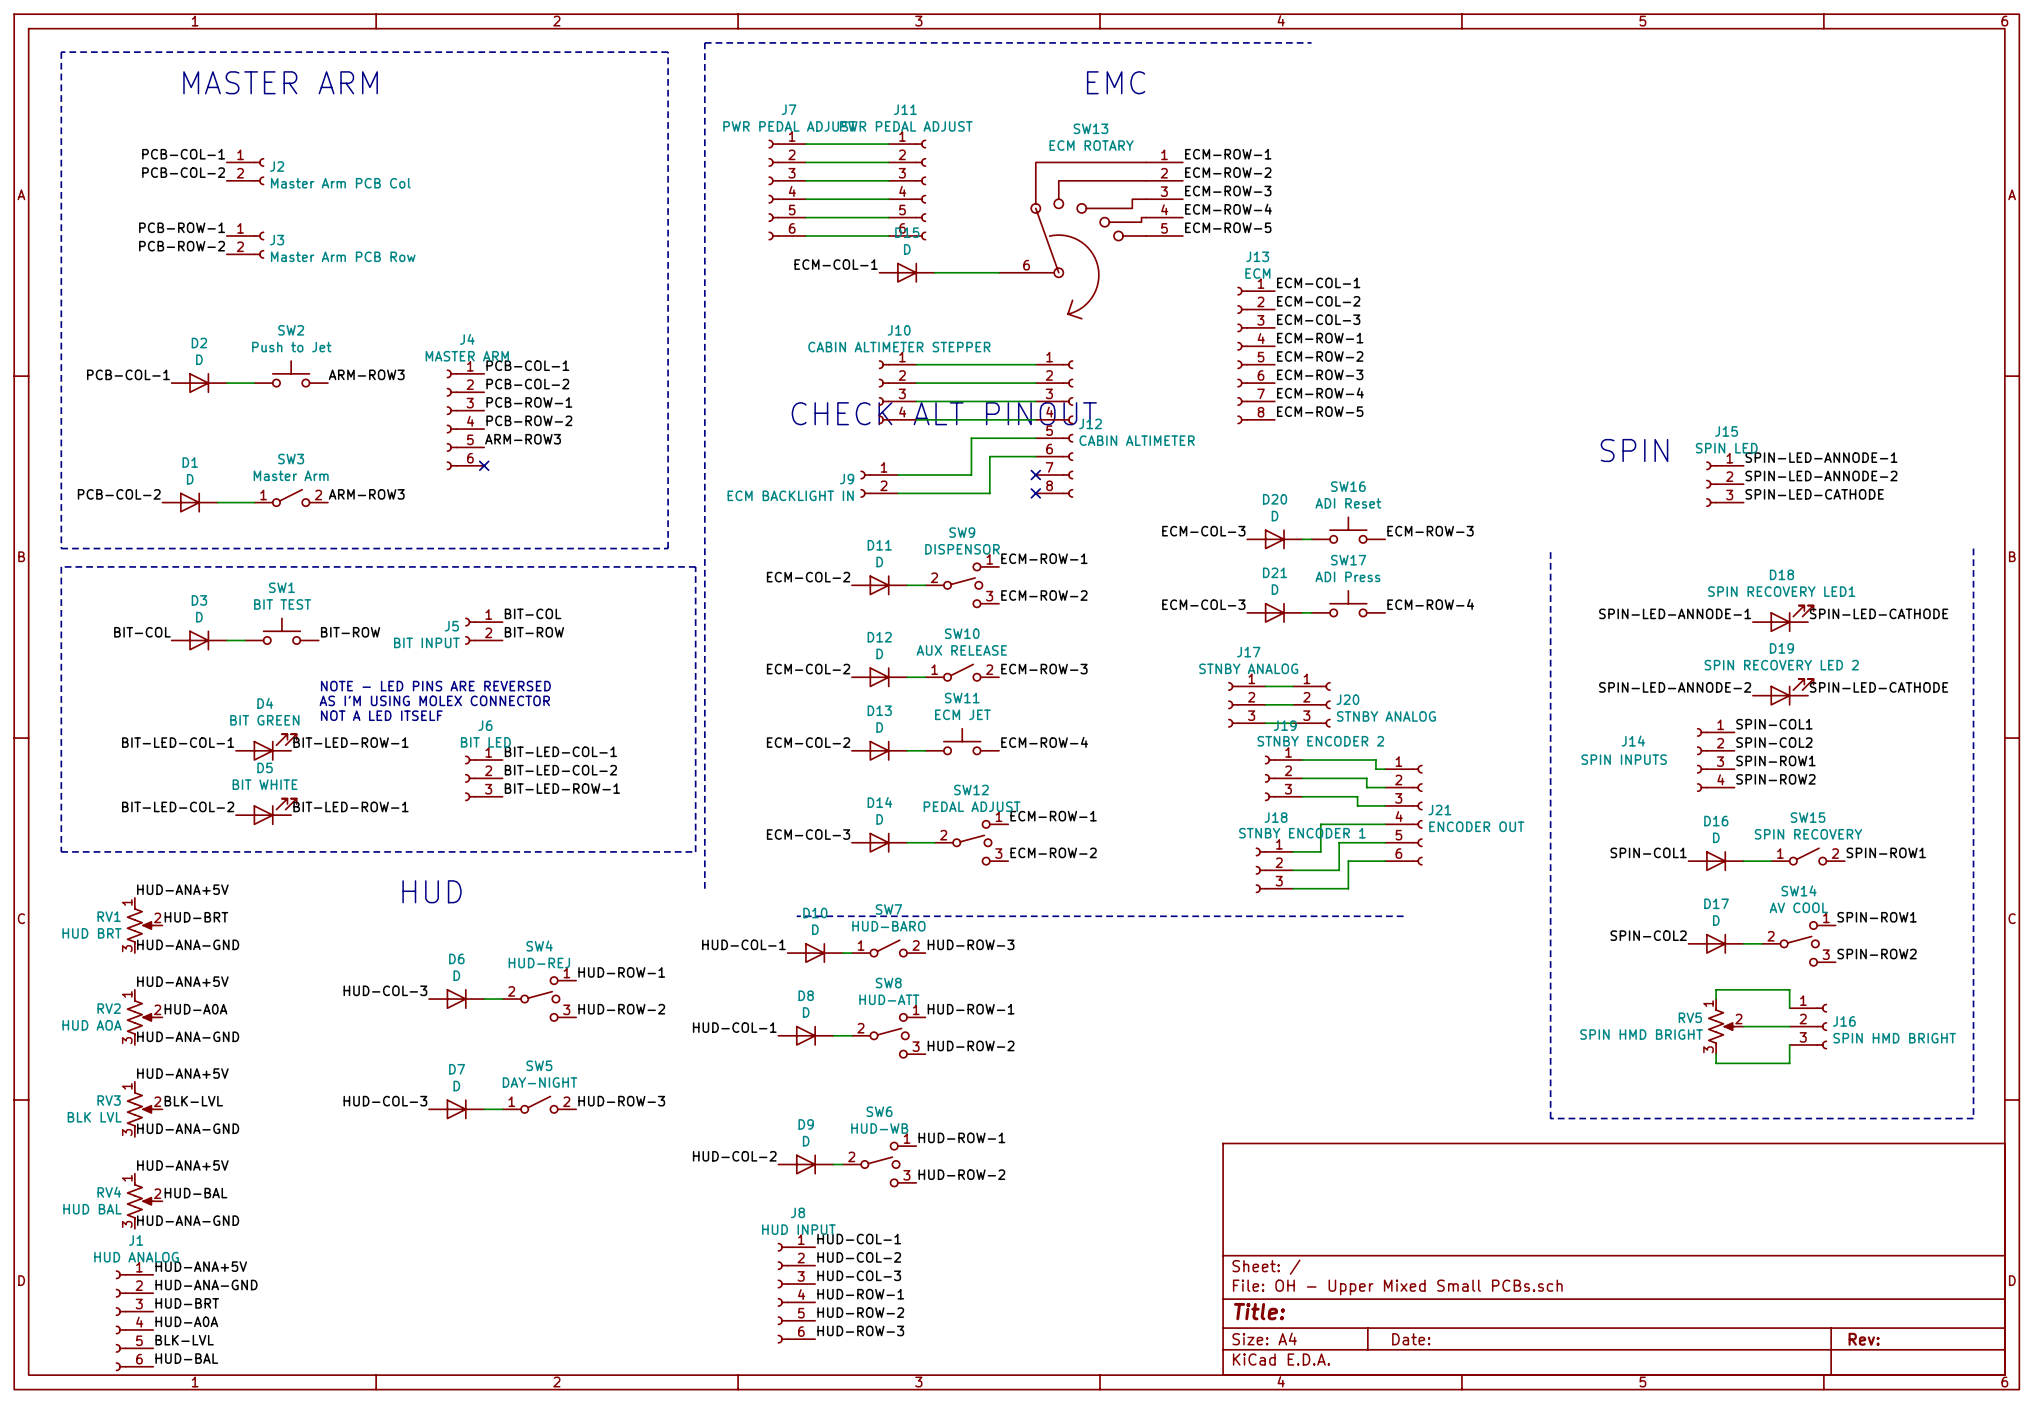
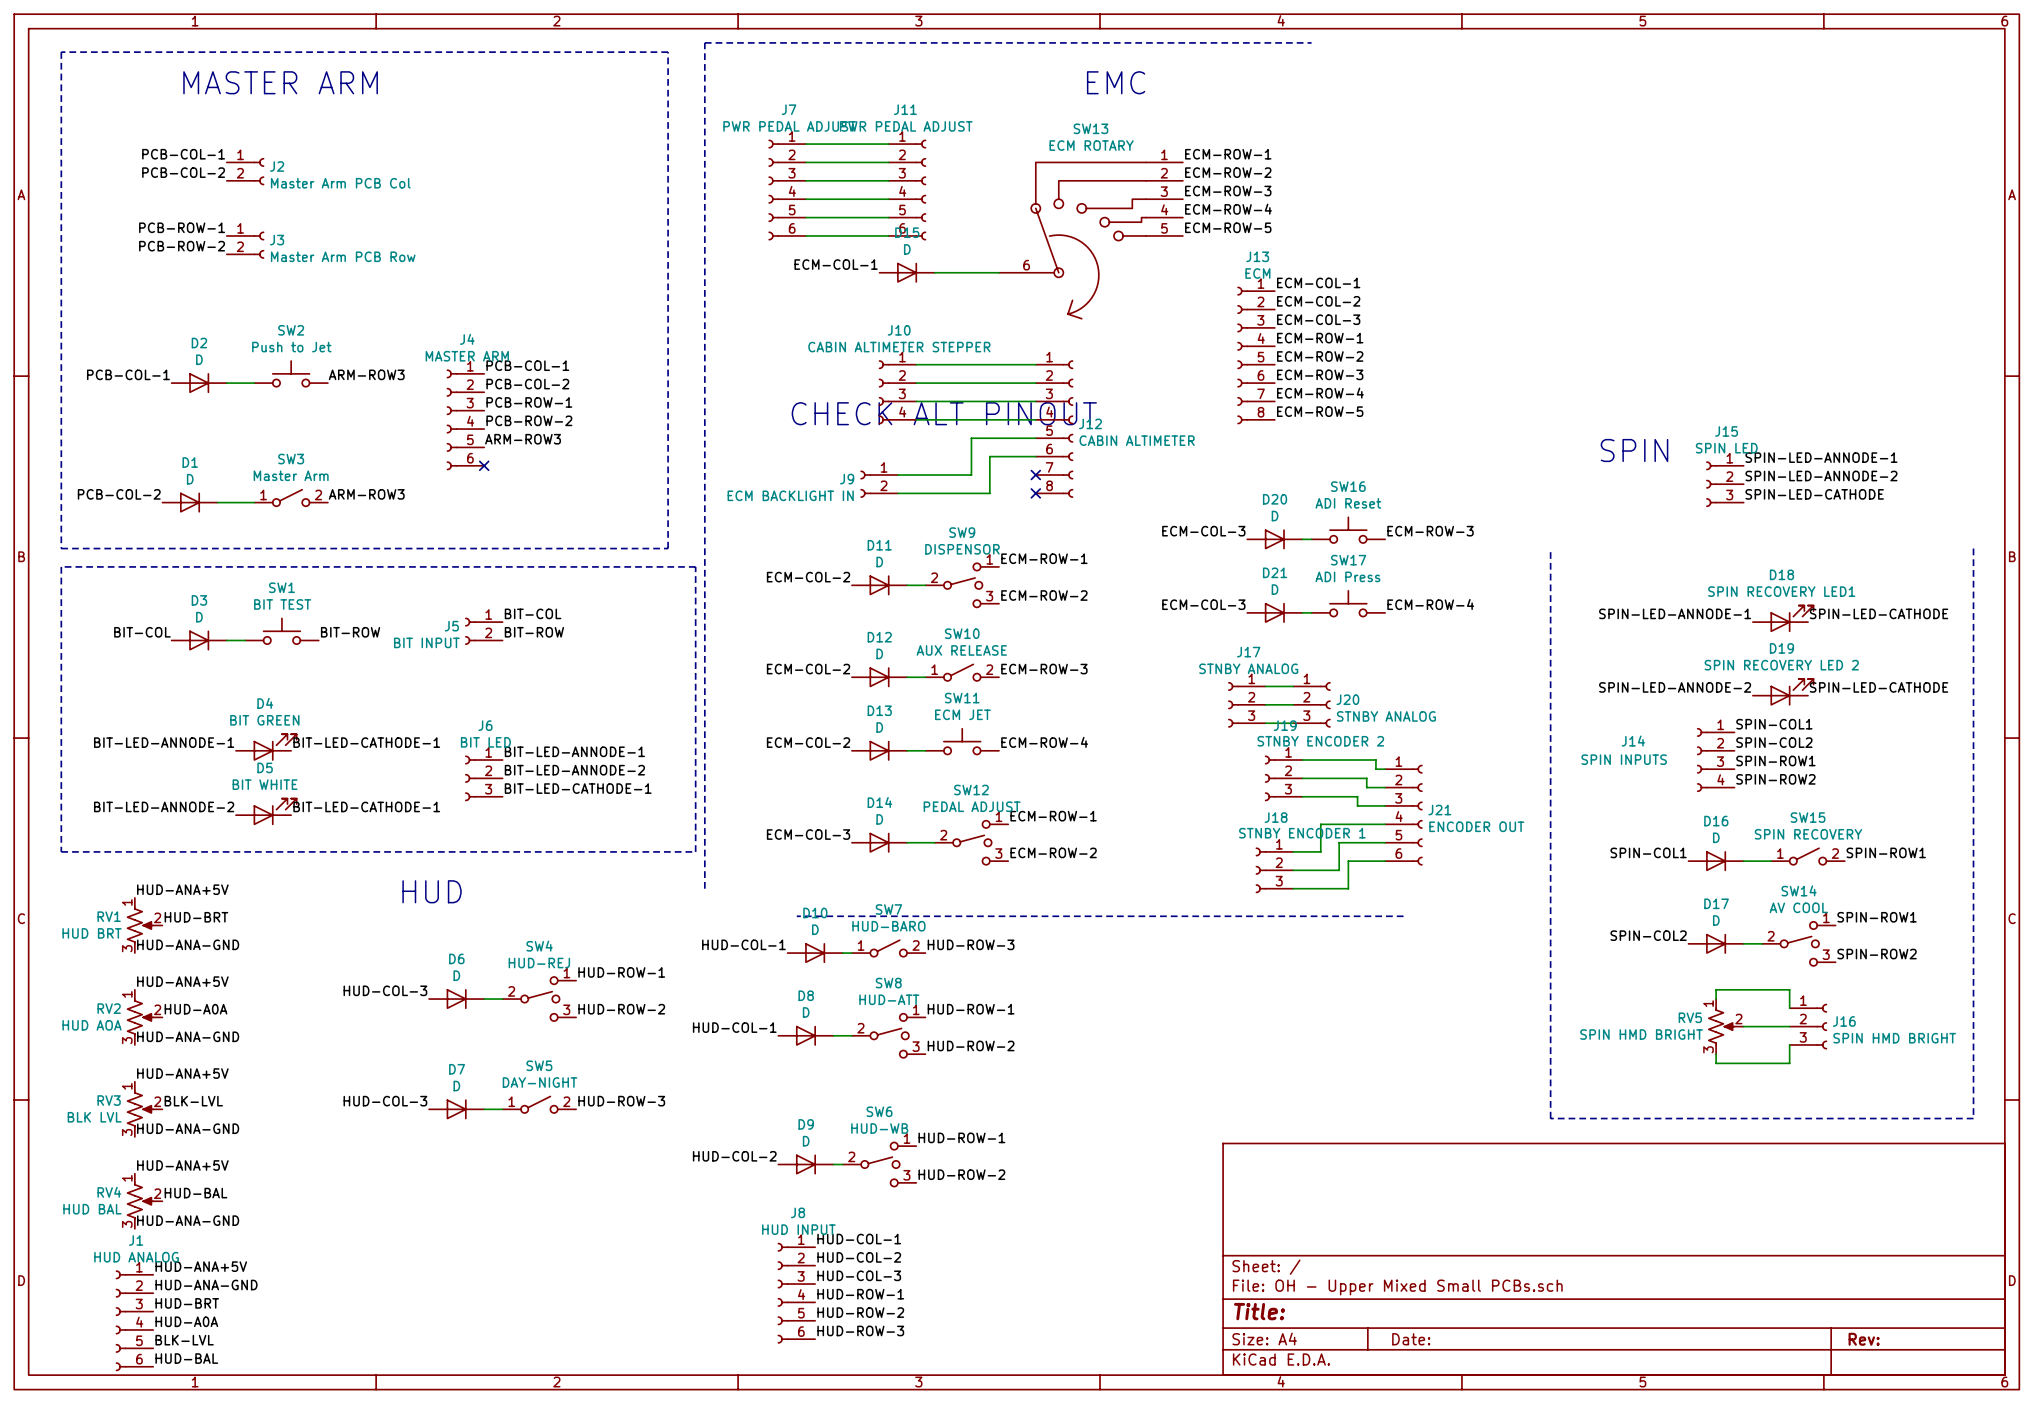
text: NOTE - LED PINS ARE REVERSED (435, 686) -> none
text: AS I’M USING MOLEX CONNECTOR (434, 700) -> none
text: NOT A LED ITSELF (381, 715) -> none
label: BIT-LED-COL-1 (178, 742) -> BIT-LED-ANNODE-1 (164, 742)
label: BIT-LED-ROW-1 (350, 742) -> BIT-LED-CATHODE-1 (366, 742)
label: BIT-LED-COL-1 (560, 751) -> BIT-LED-ANNODE-1 (574, 751)
label: BIT-LED-COL-2 (560, 770) -> BIT-LED-ANNODE-2 (574, 770)
label: BIT-LED-ROW-1 (562, 788) -> BIT-LED-CATHODE-1 (578, 788)
label: BIT-LED-COL-2 (178, 806) -> BIT-LED-ANNODE-2 (164, 806)
label: BIT-LED-ROW-1 (350, 806) -> BIT-LED-CATHODE-1 (366, 806)

